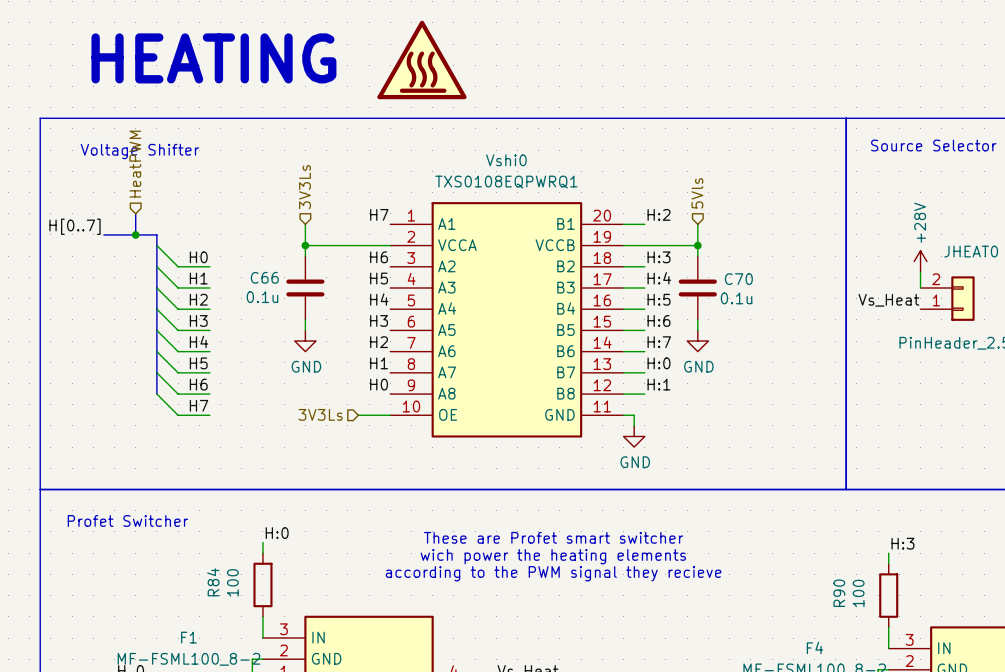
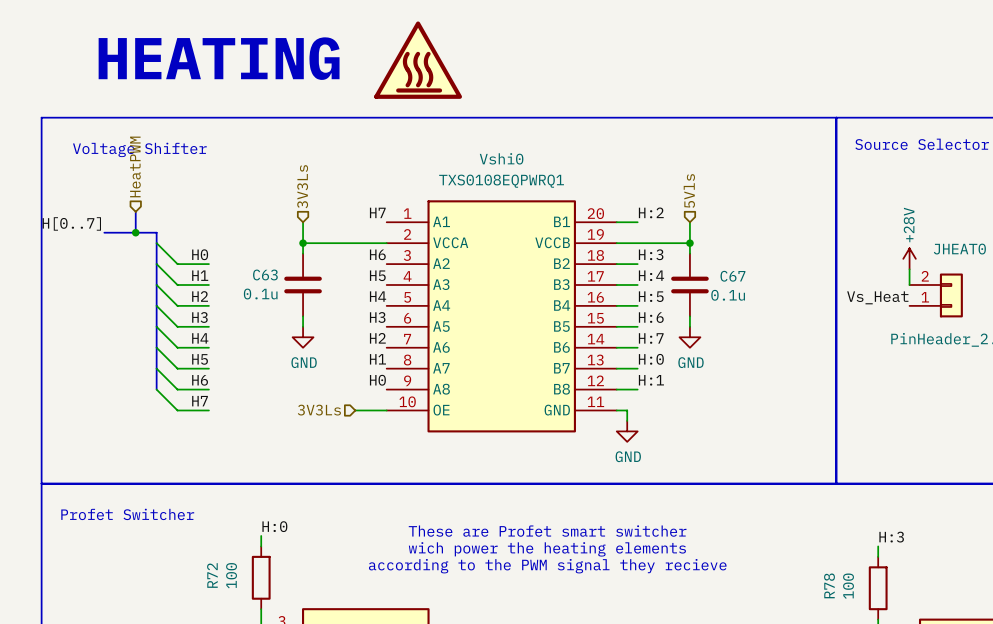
C66 name: C66 (264, 277) -> C63 (265, 274)
C70 name: C70 (738, 279) -> C67 (732, 276)
R84 name: R84 (213, 582) -> R72 (212, 575)
R90 name: R90 (839, 593) -> R78 (829, 585)

